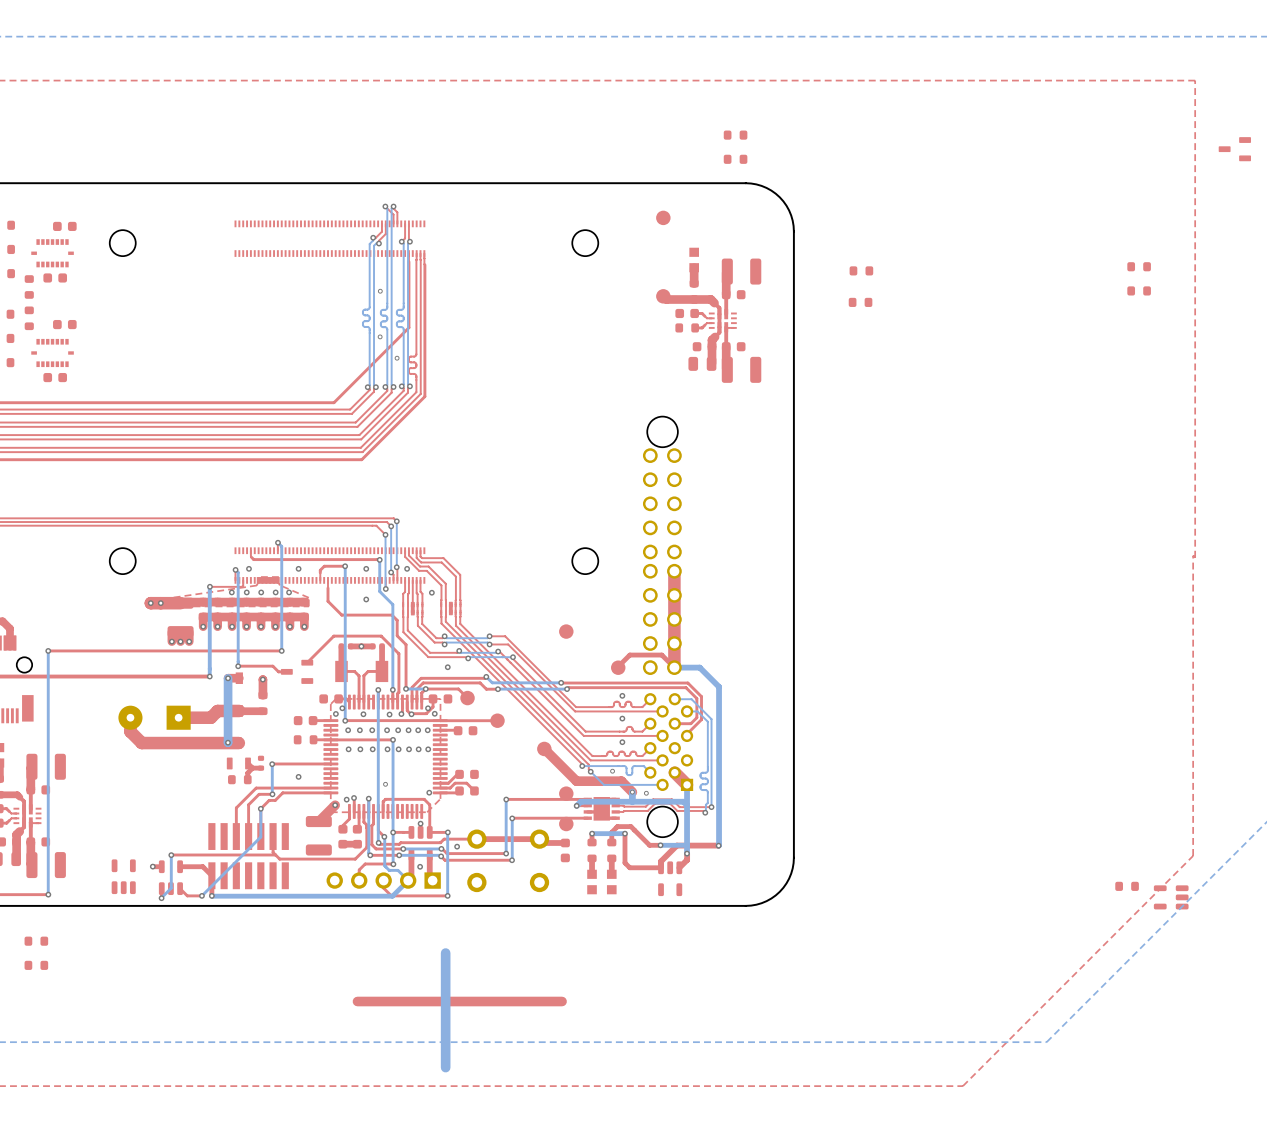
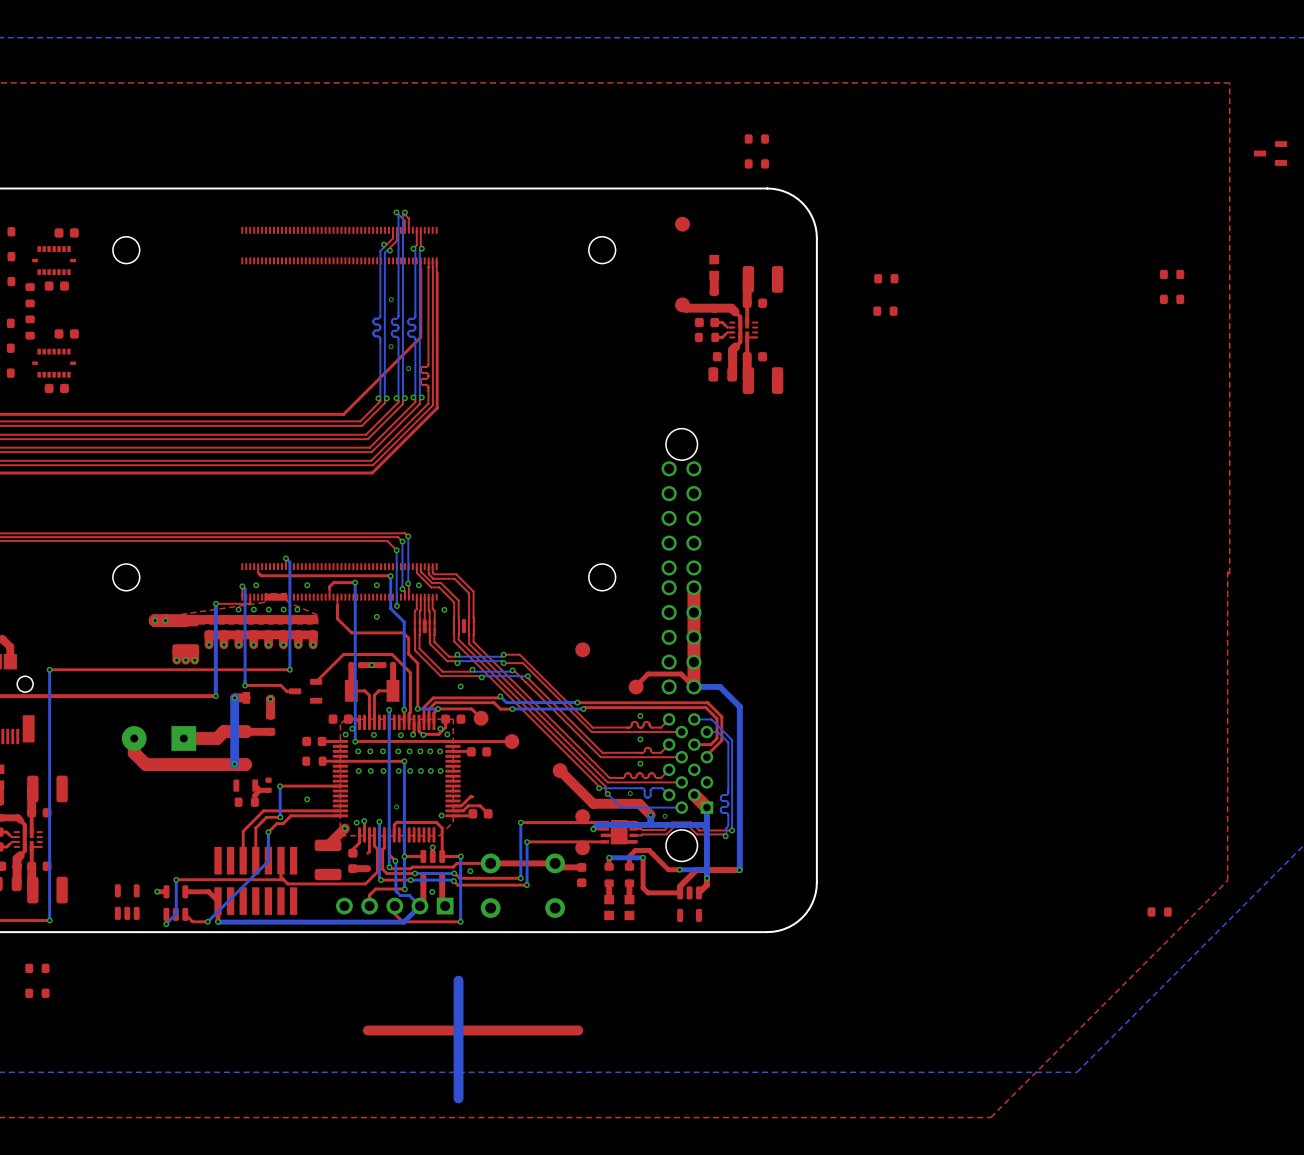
part: (467, 774) -> none
part: (357, 836) -> none
part: (1171, 897) -> none

